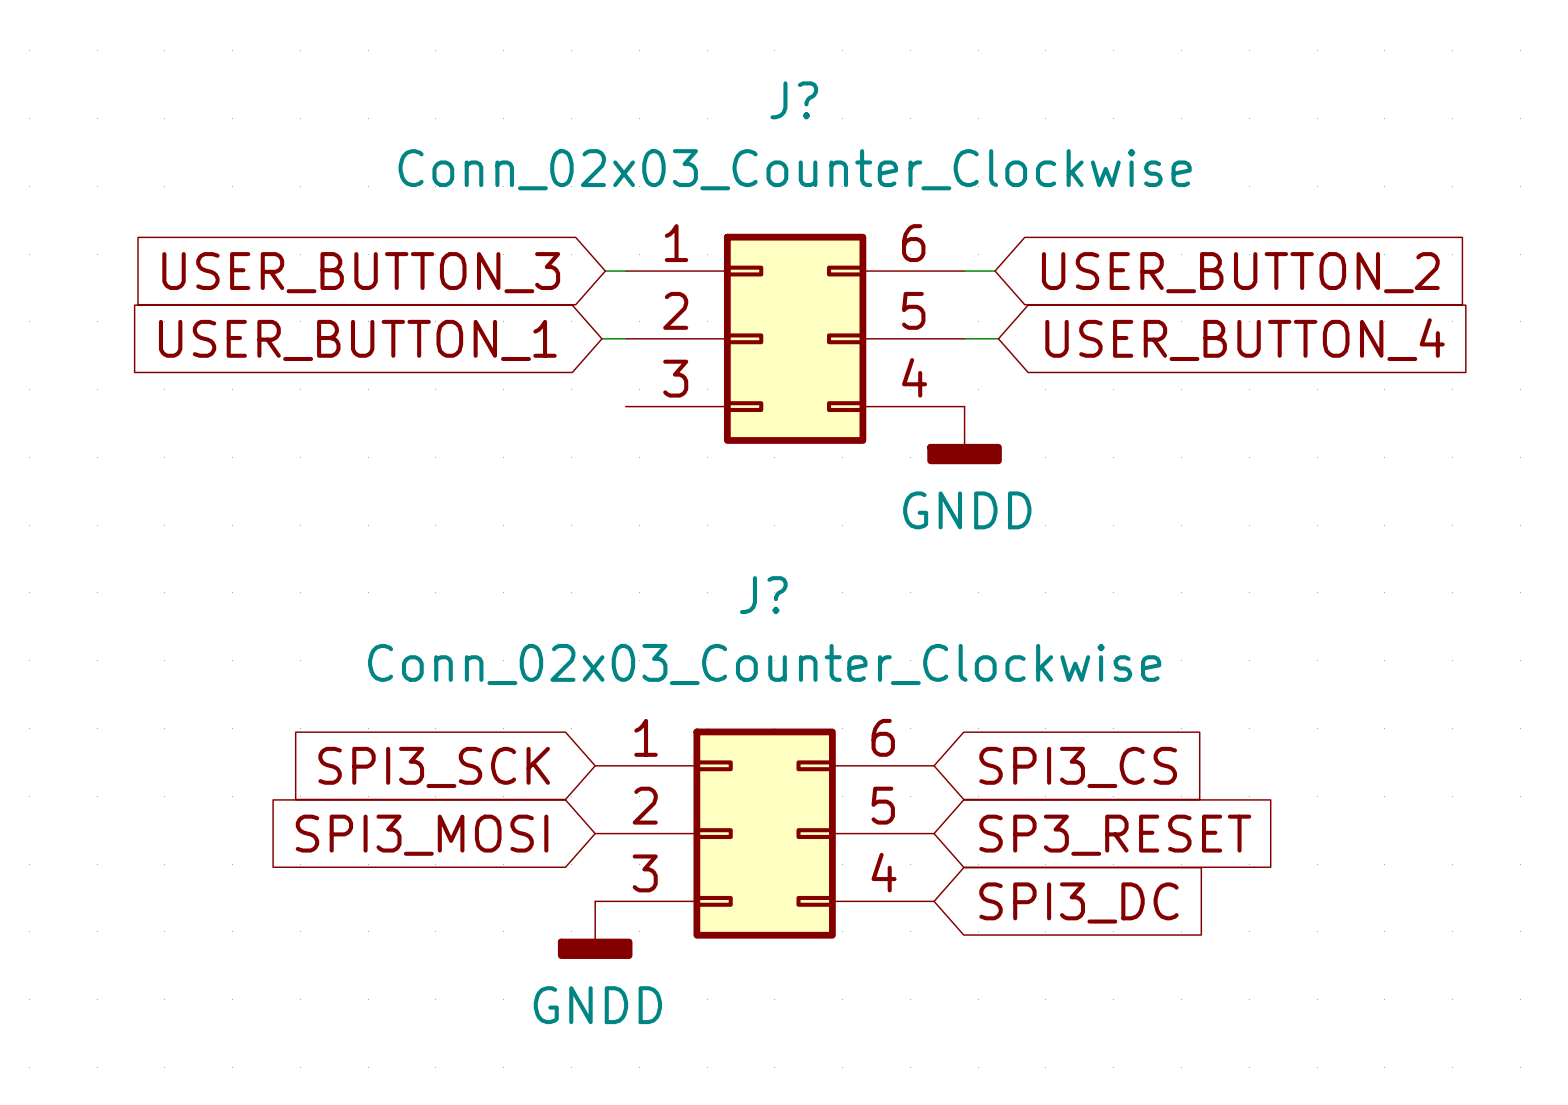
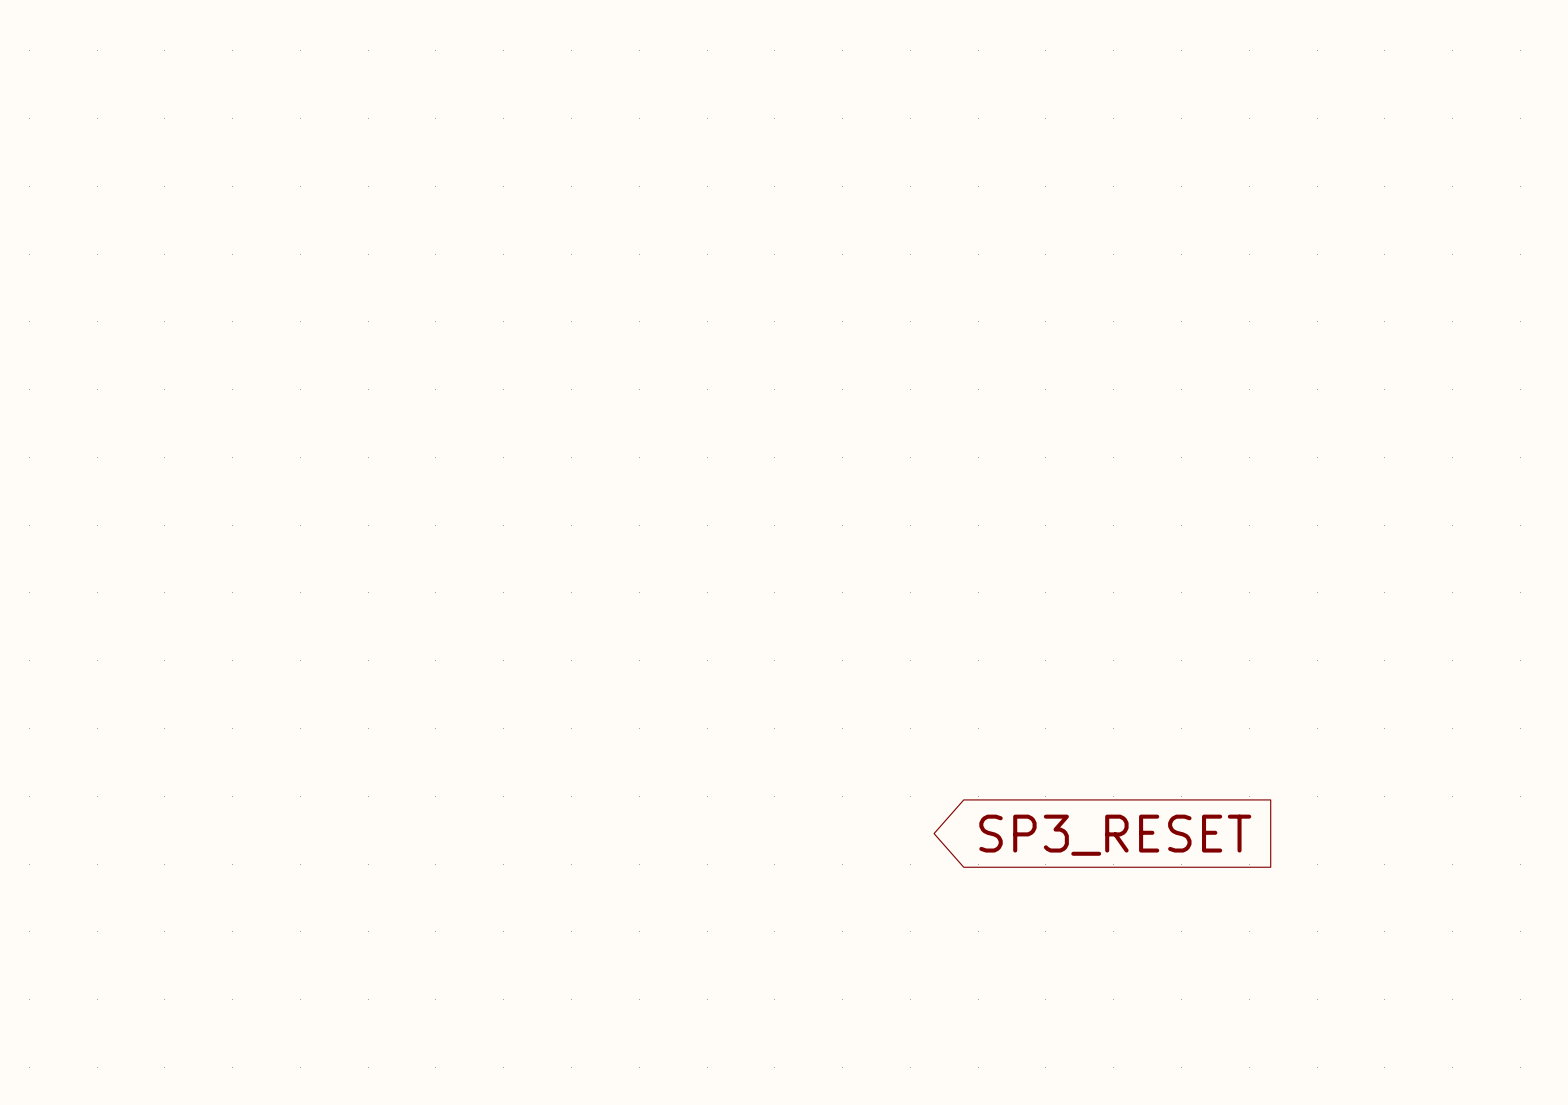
wire: (605, 271) (625, 271) -> none
wire: (964, 271) (995, 271) -> none
global label: USER_BUTTON_3 (361, 272) -> none
global label: USER_BUTTON_2 (1240, 272) -> none
wire: (601, 338) (625, 338) -> none
J?: Conn_02x03_Counter_Clockwise (795, 338) -> none
wire: (964, 338) (998, 338) -> none
global label: USER_BUTTON_4 (1245, 339) -> none
global label: USER_BUTTON_1 (357, 340) -> none
power symbol: GNDD (964, 435) -> none
global label: SPI3_SCK (434, 767) -> none
global label: SPI3_CS (1078, 767) -> none
J?: Conn_02x03_Counter_Clockwise (764, 833) -> none
global label: SPI3_MOSI (422, 835) -> none
global label: SPI3_DC (1078, 902) -> none
power symbol: GNDD (595, 930) -> none

